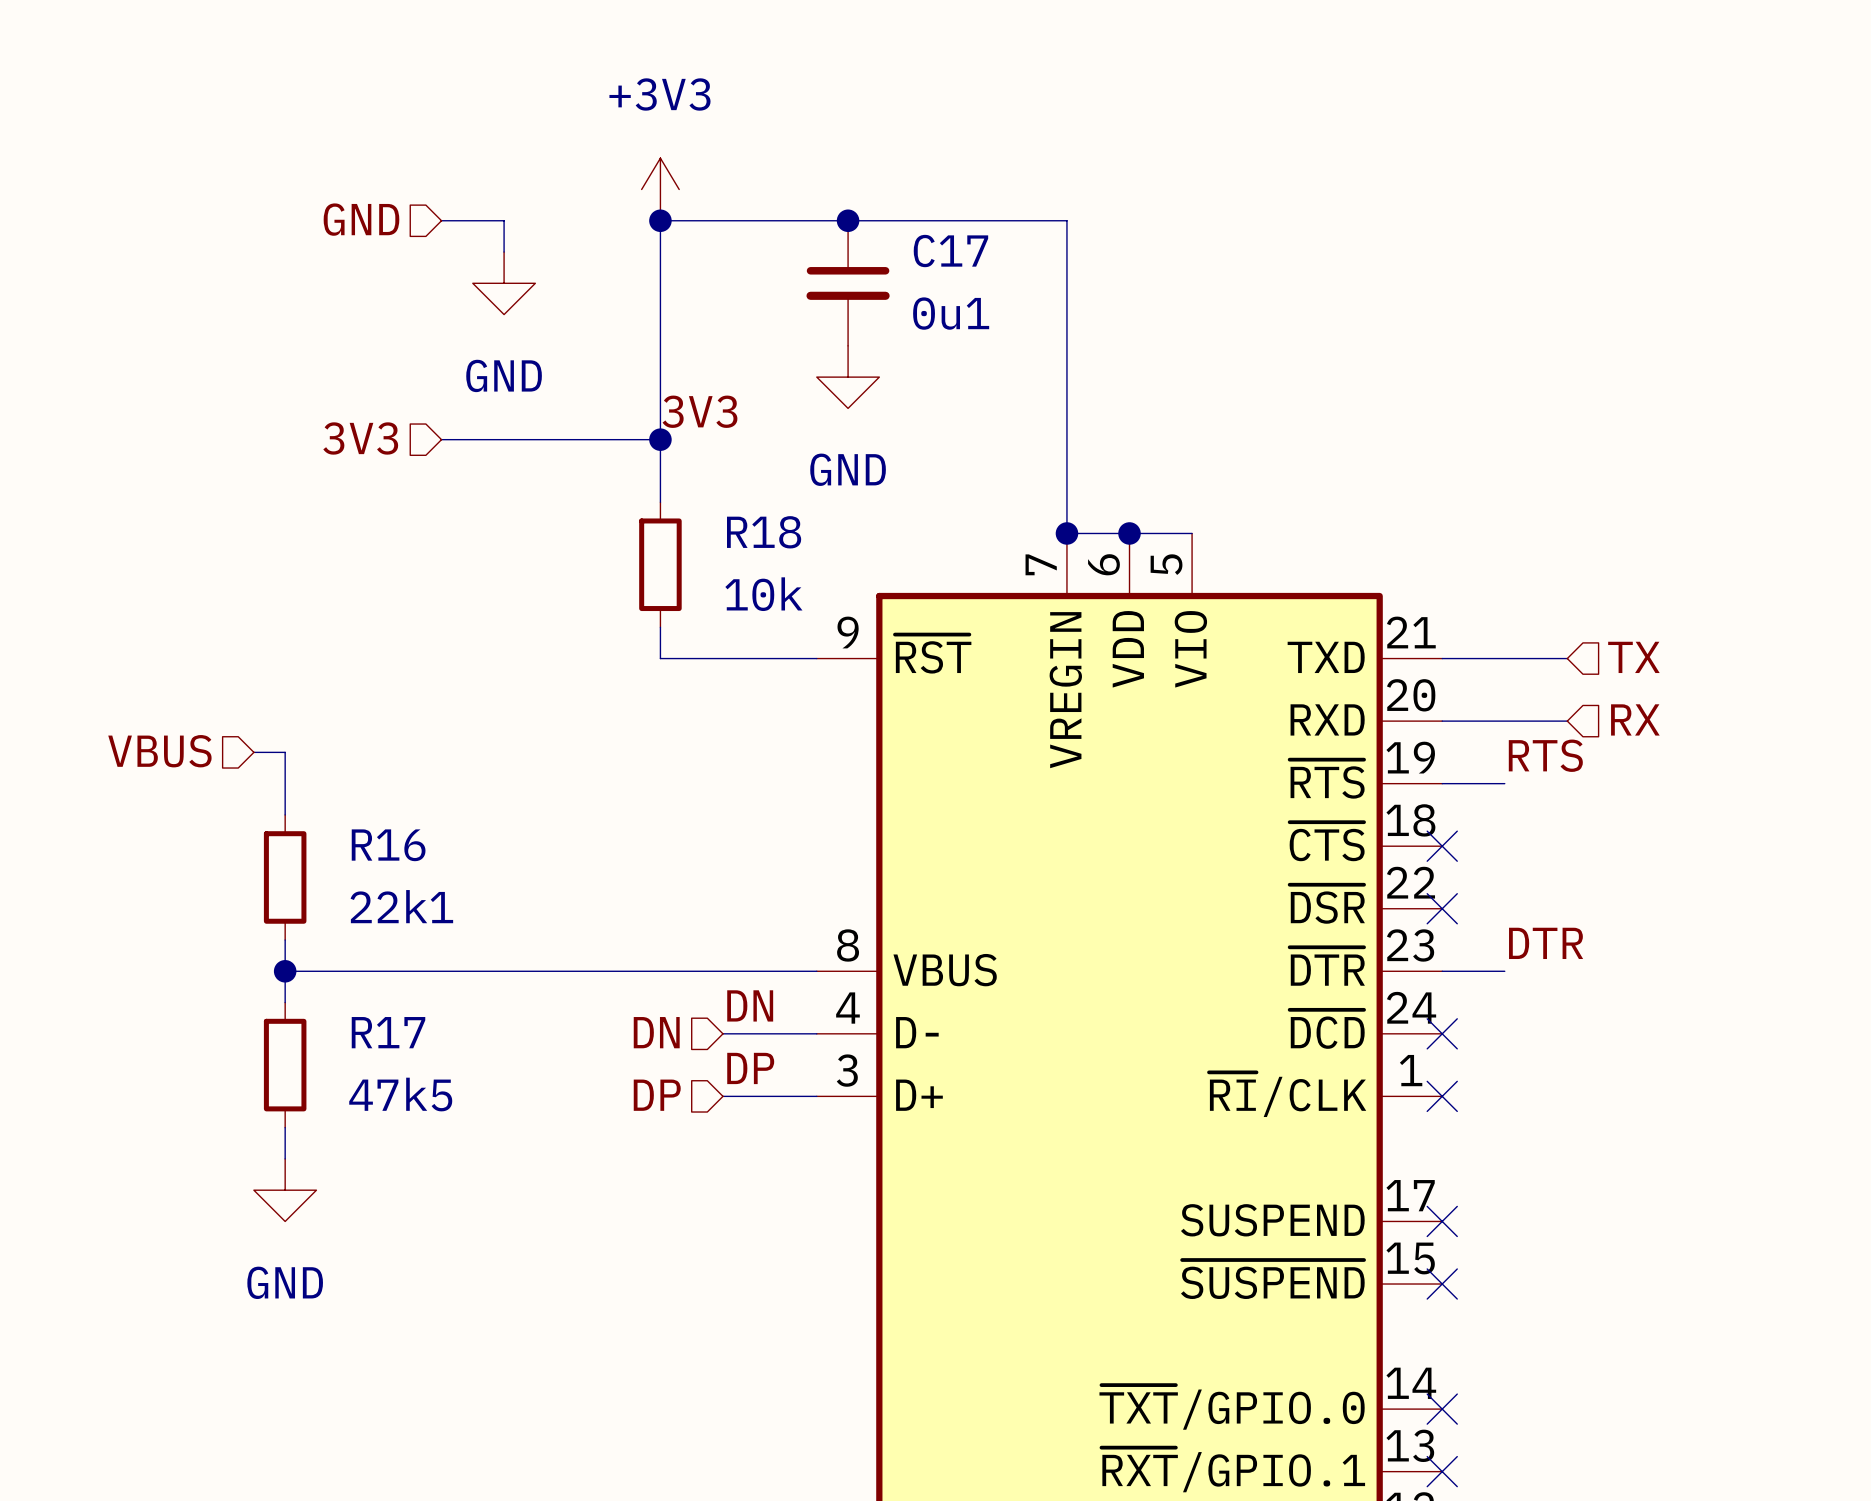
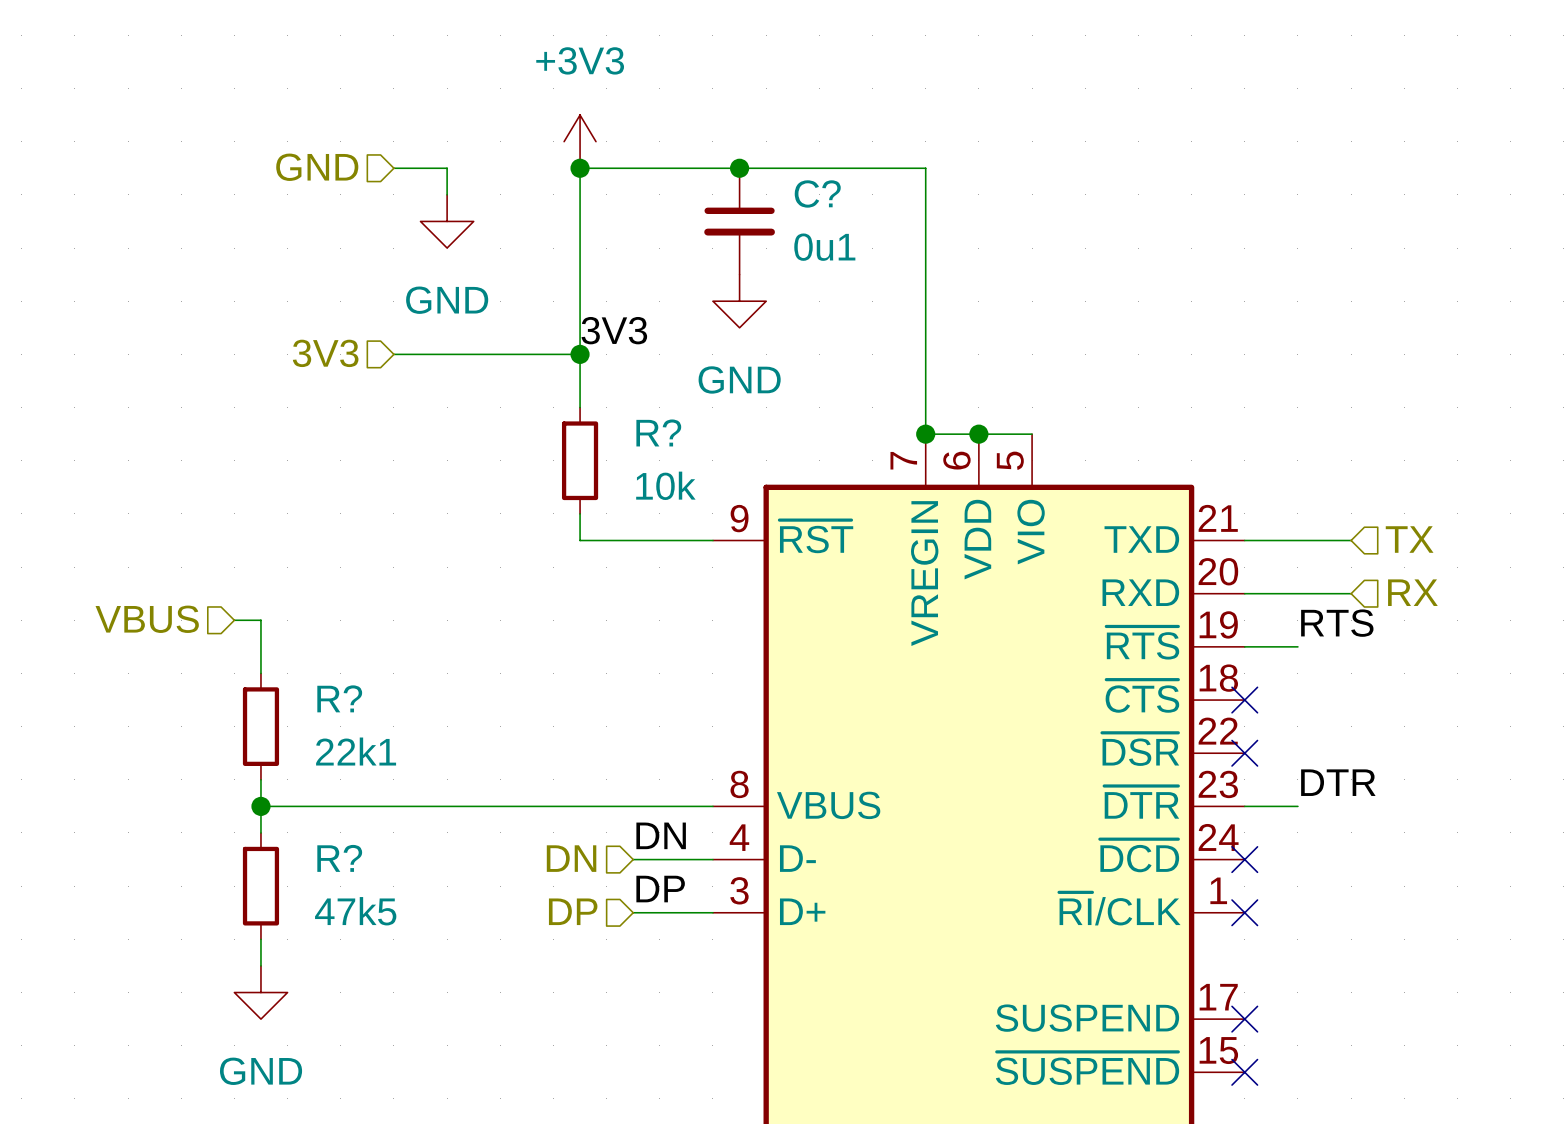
C17 name: C17 (950, 251) -> C? (817, 193)
R18 name: R18 (764, 532) -> R? (658, 432)
R16 name: R16 (388, 845) -> R? (339, 698)
R17 name: R17 (388, 1032) -> R? (339, 858)

